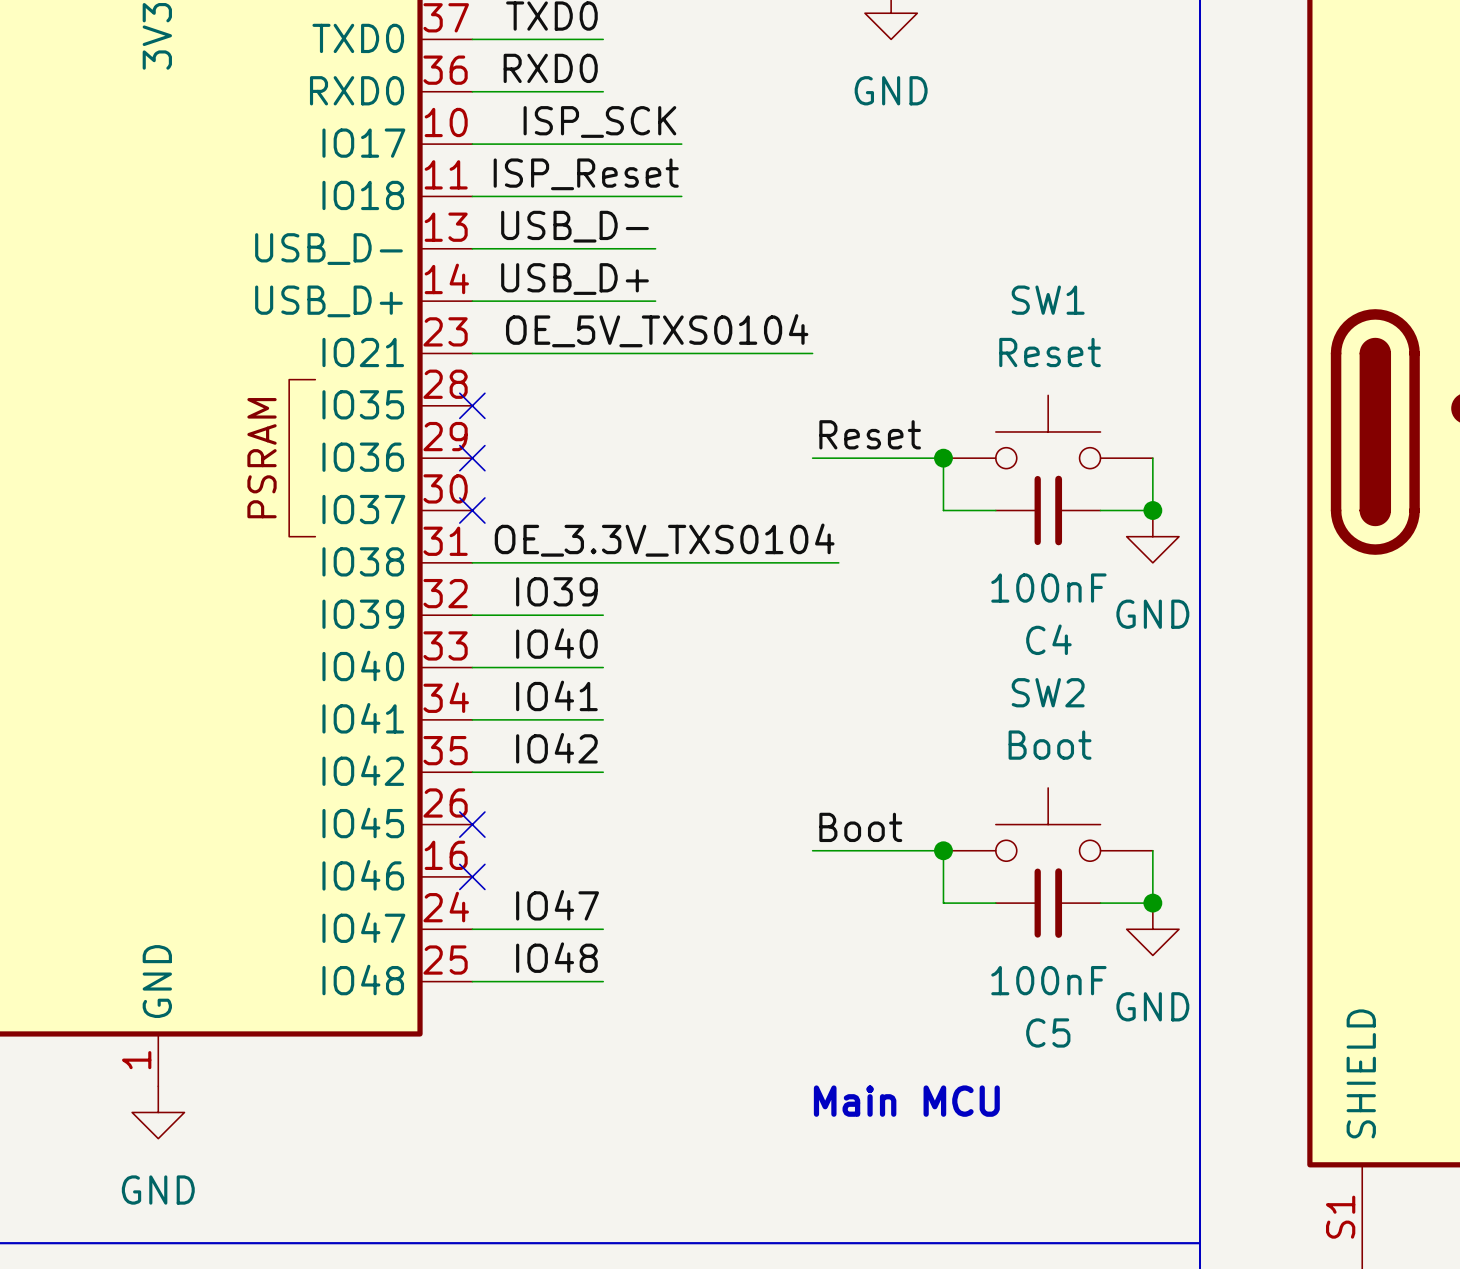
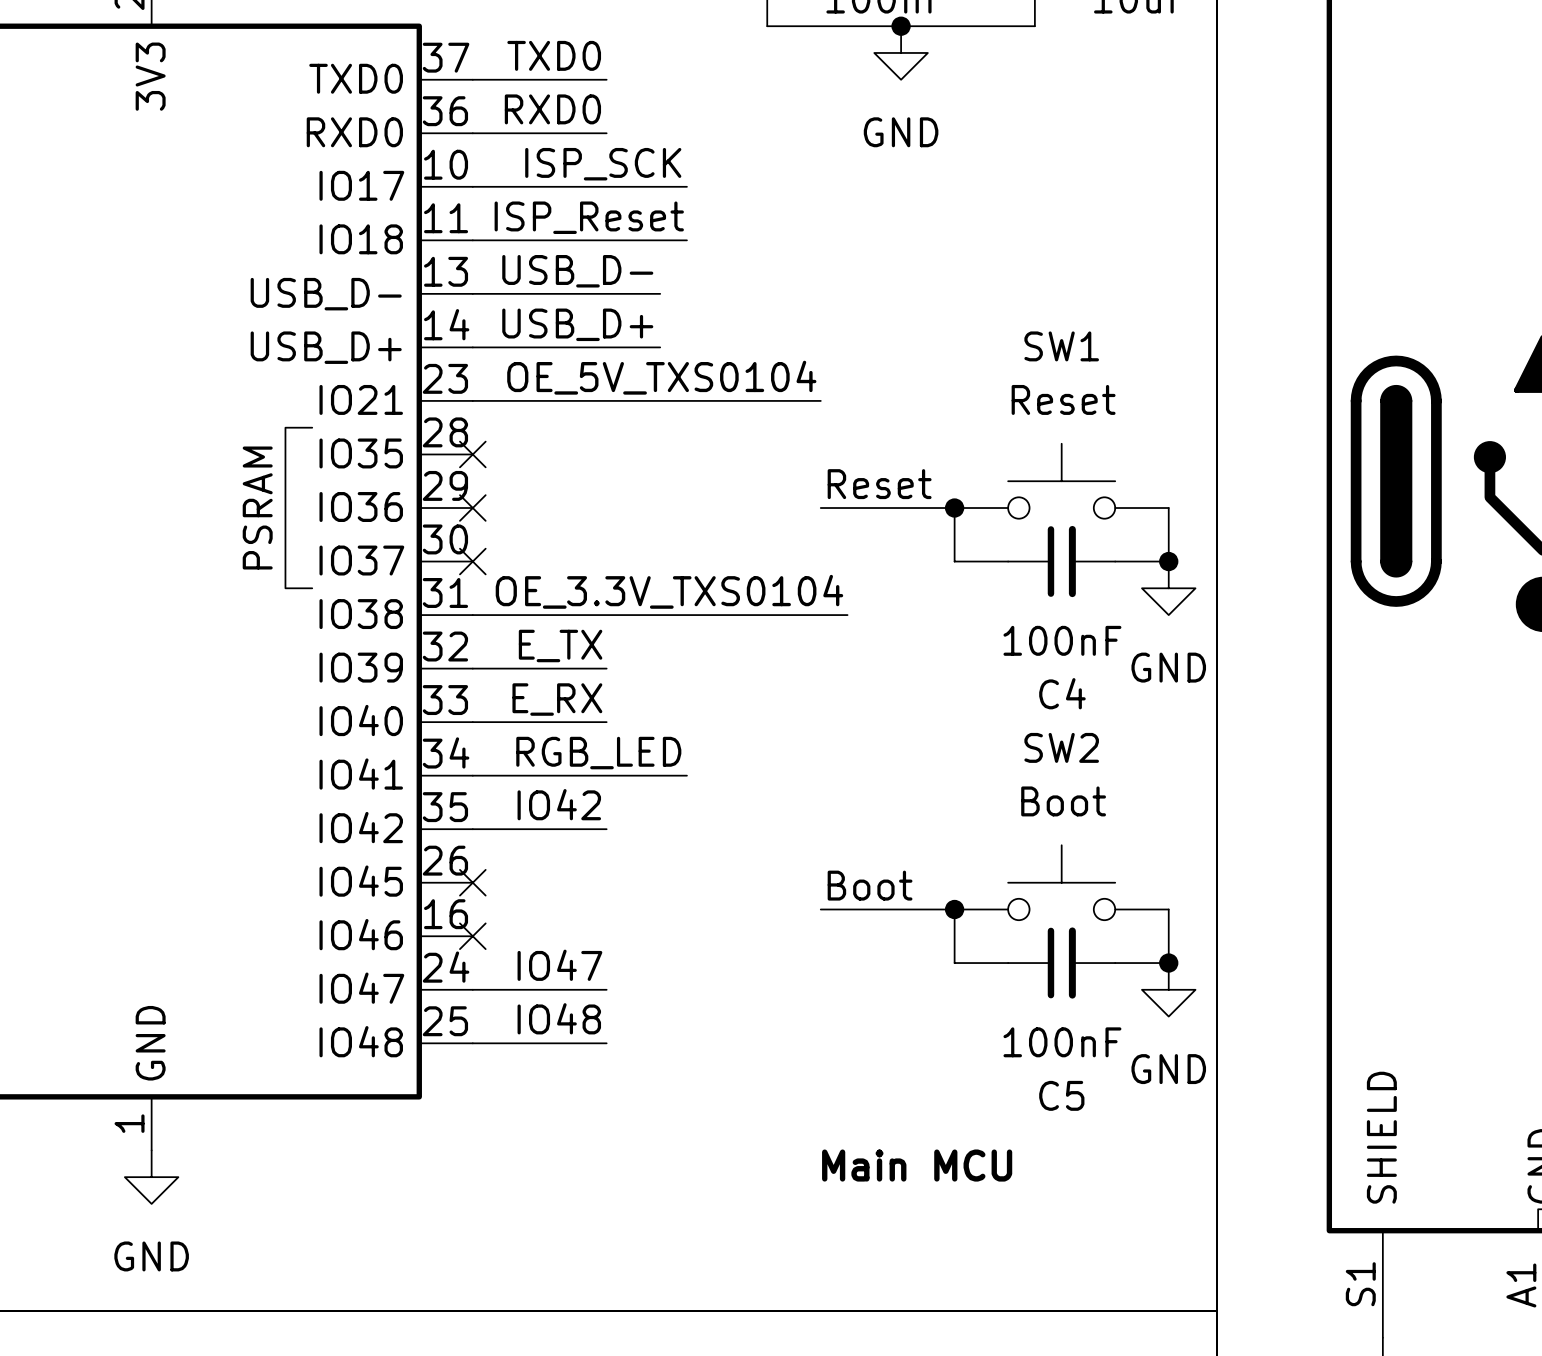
label: IO39 (556, 591) -> E_TX (560, 645)
label: IO40 (556, 643) -> E_RX (557, 699)
label: IO41 (556, 695) -> none
label: none -> RGB_LED (598, 753)
wire: none -> (606, 775) (686, 775)

